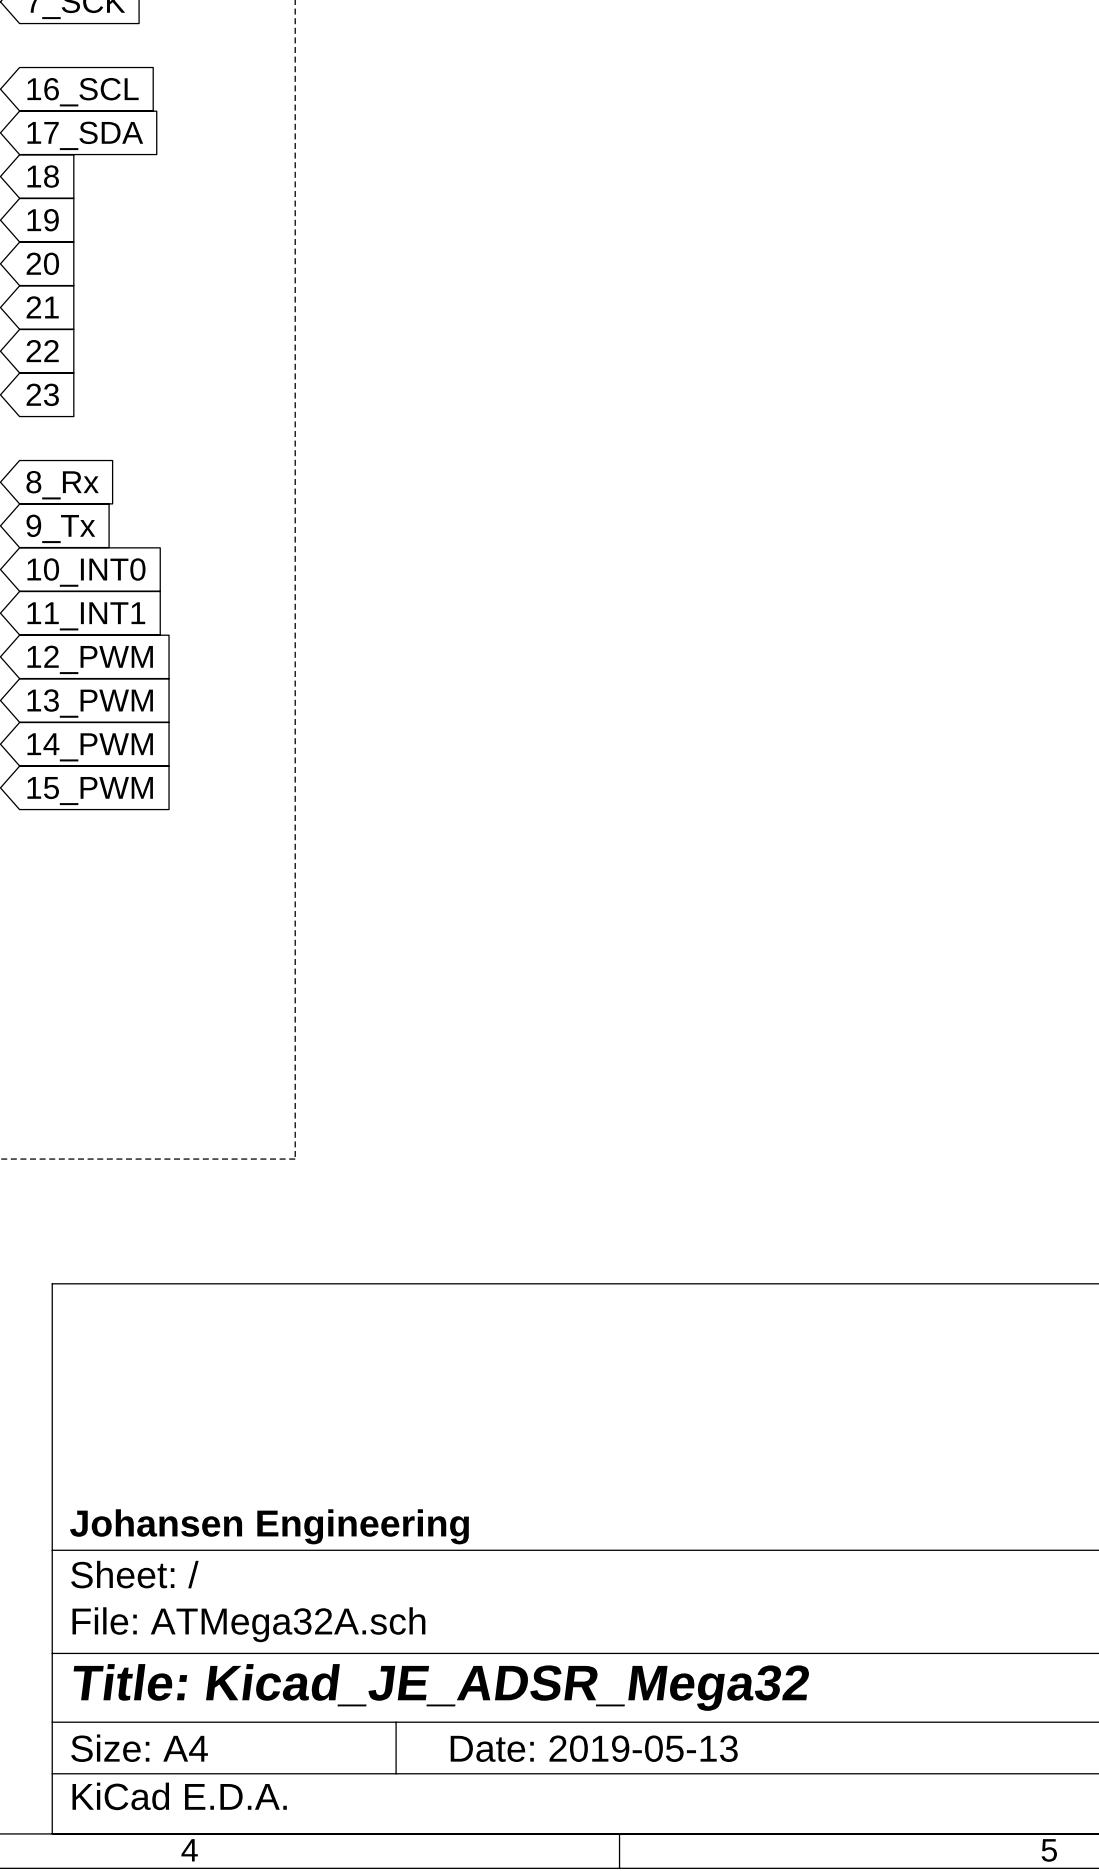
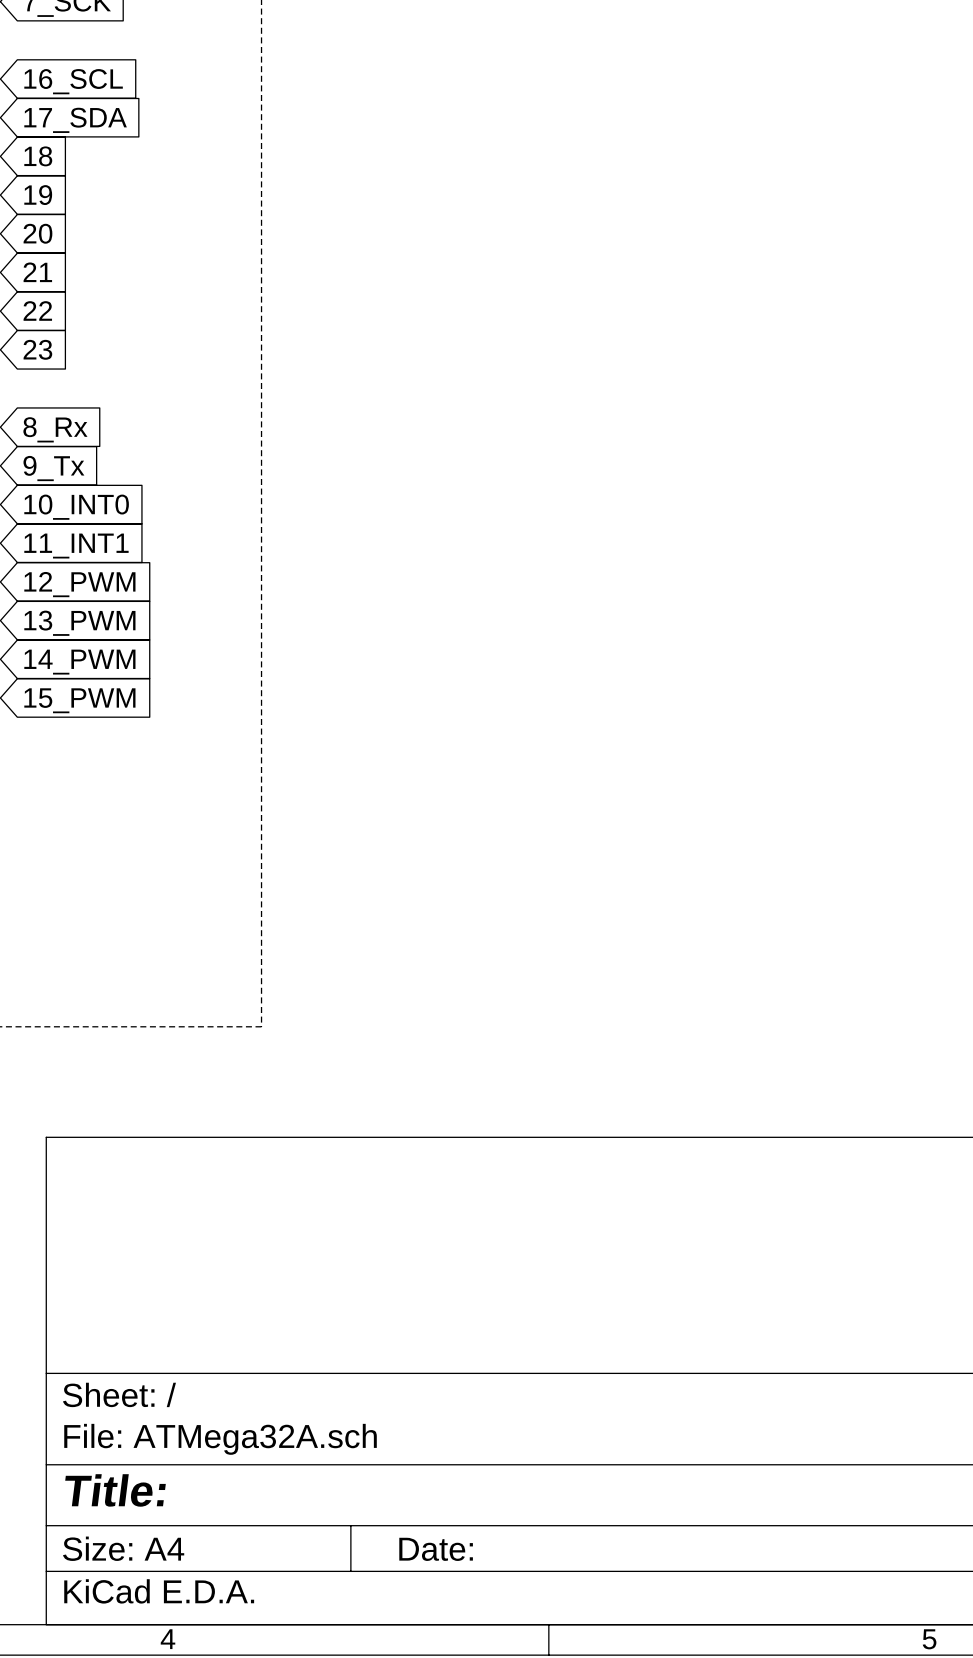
title block: Johansen Engineering (269, 1526) -> none
title block: Title: Kicad_JE_ADSR_Mega32 (441, 1687) -> Title: (115, 1490)
title block: Date: 2019-05-13 (594, 1748) -> Date: (436, 1549)

